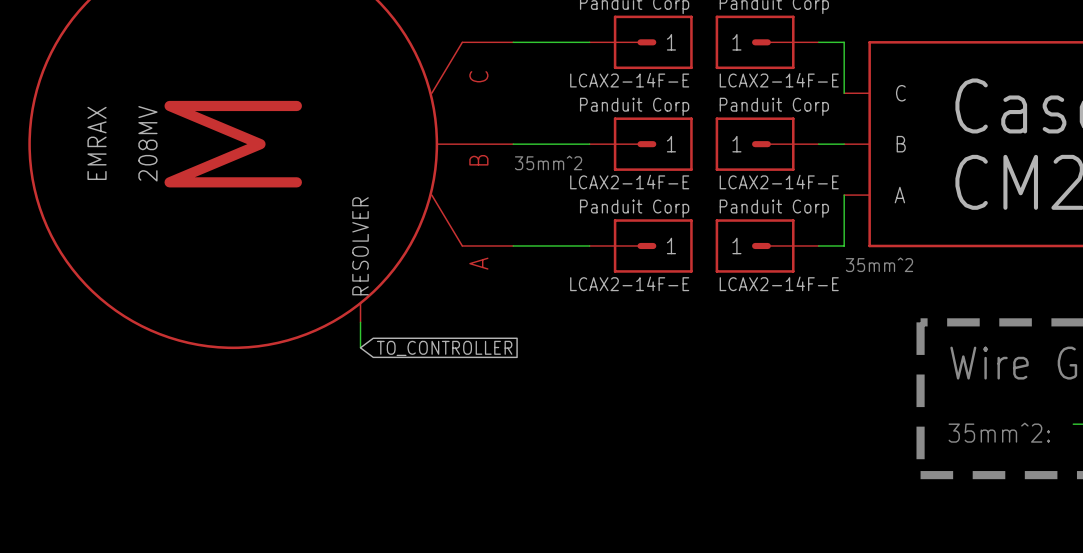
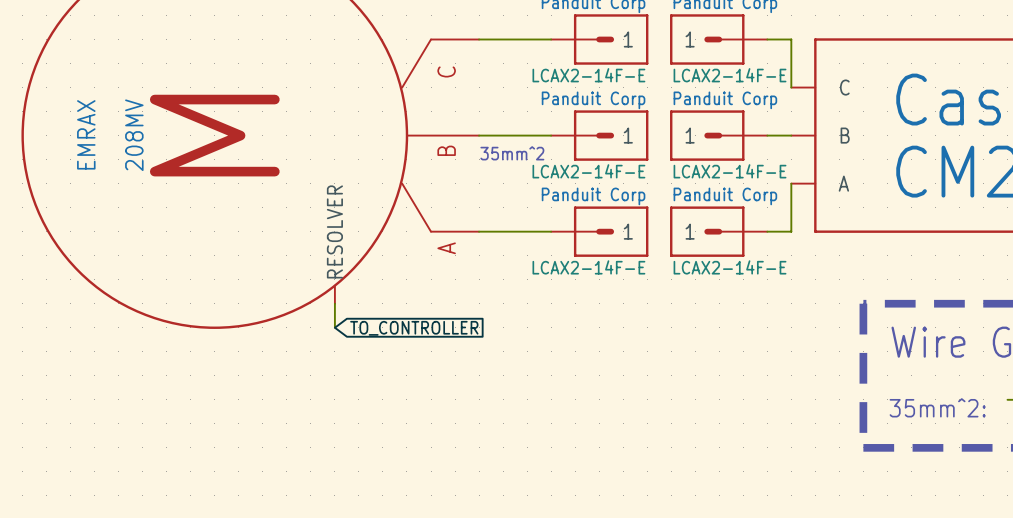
text: 35mm^2 (879, 264) -> none

